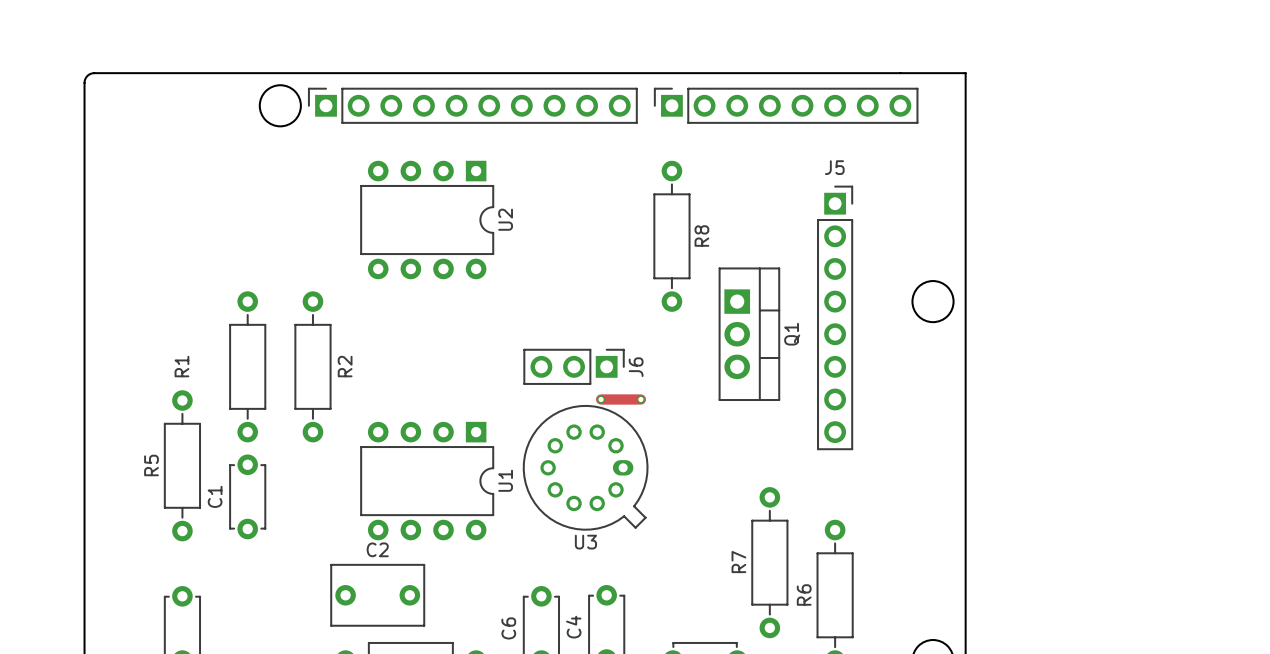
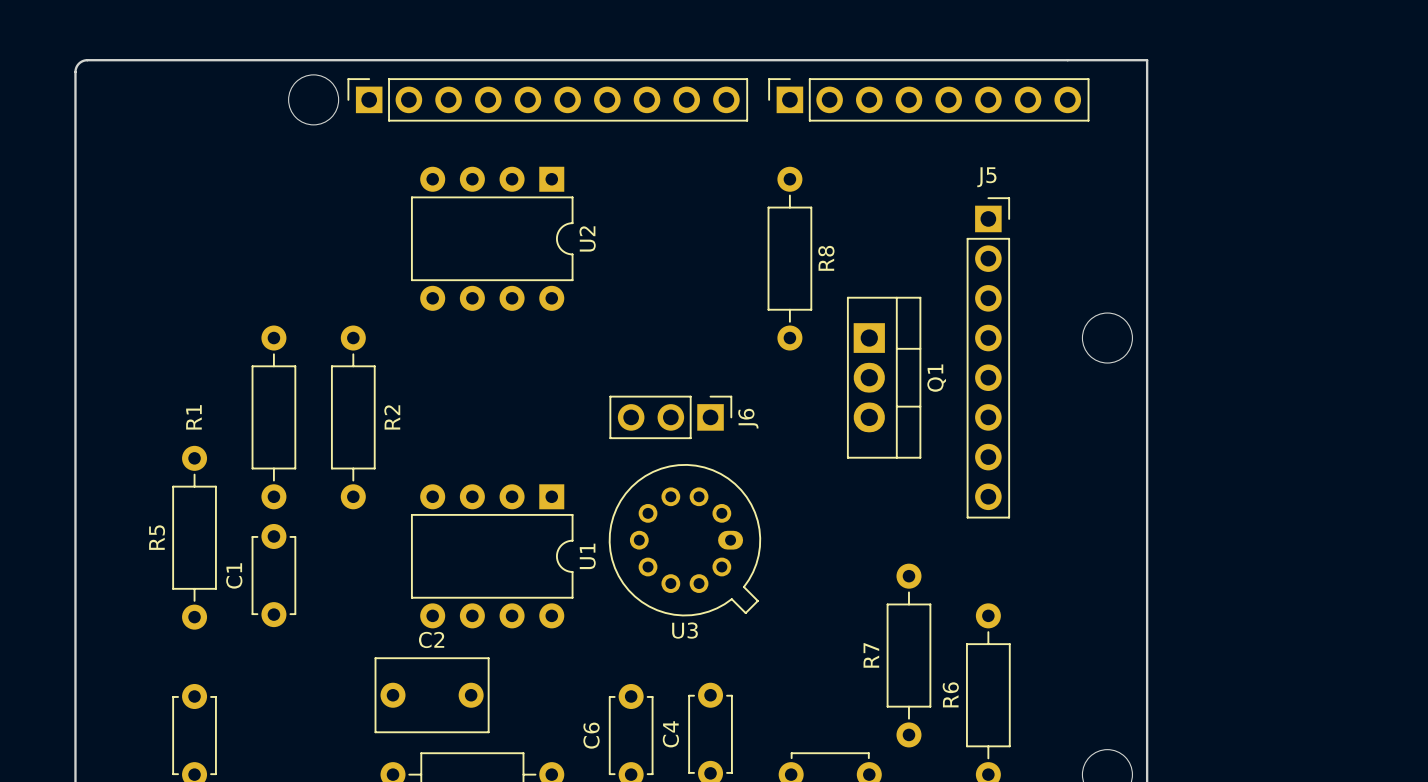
track: (601, 399) (640, 399) -> none
via: (601, 399) -> none
via: (640, 399) -> none

